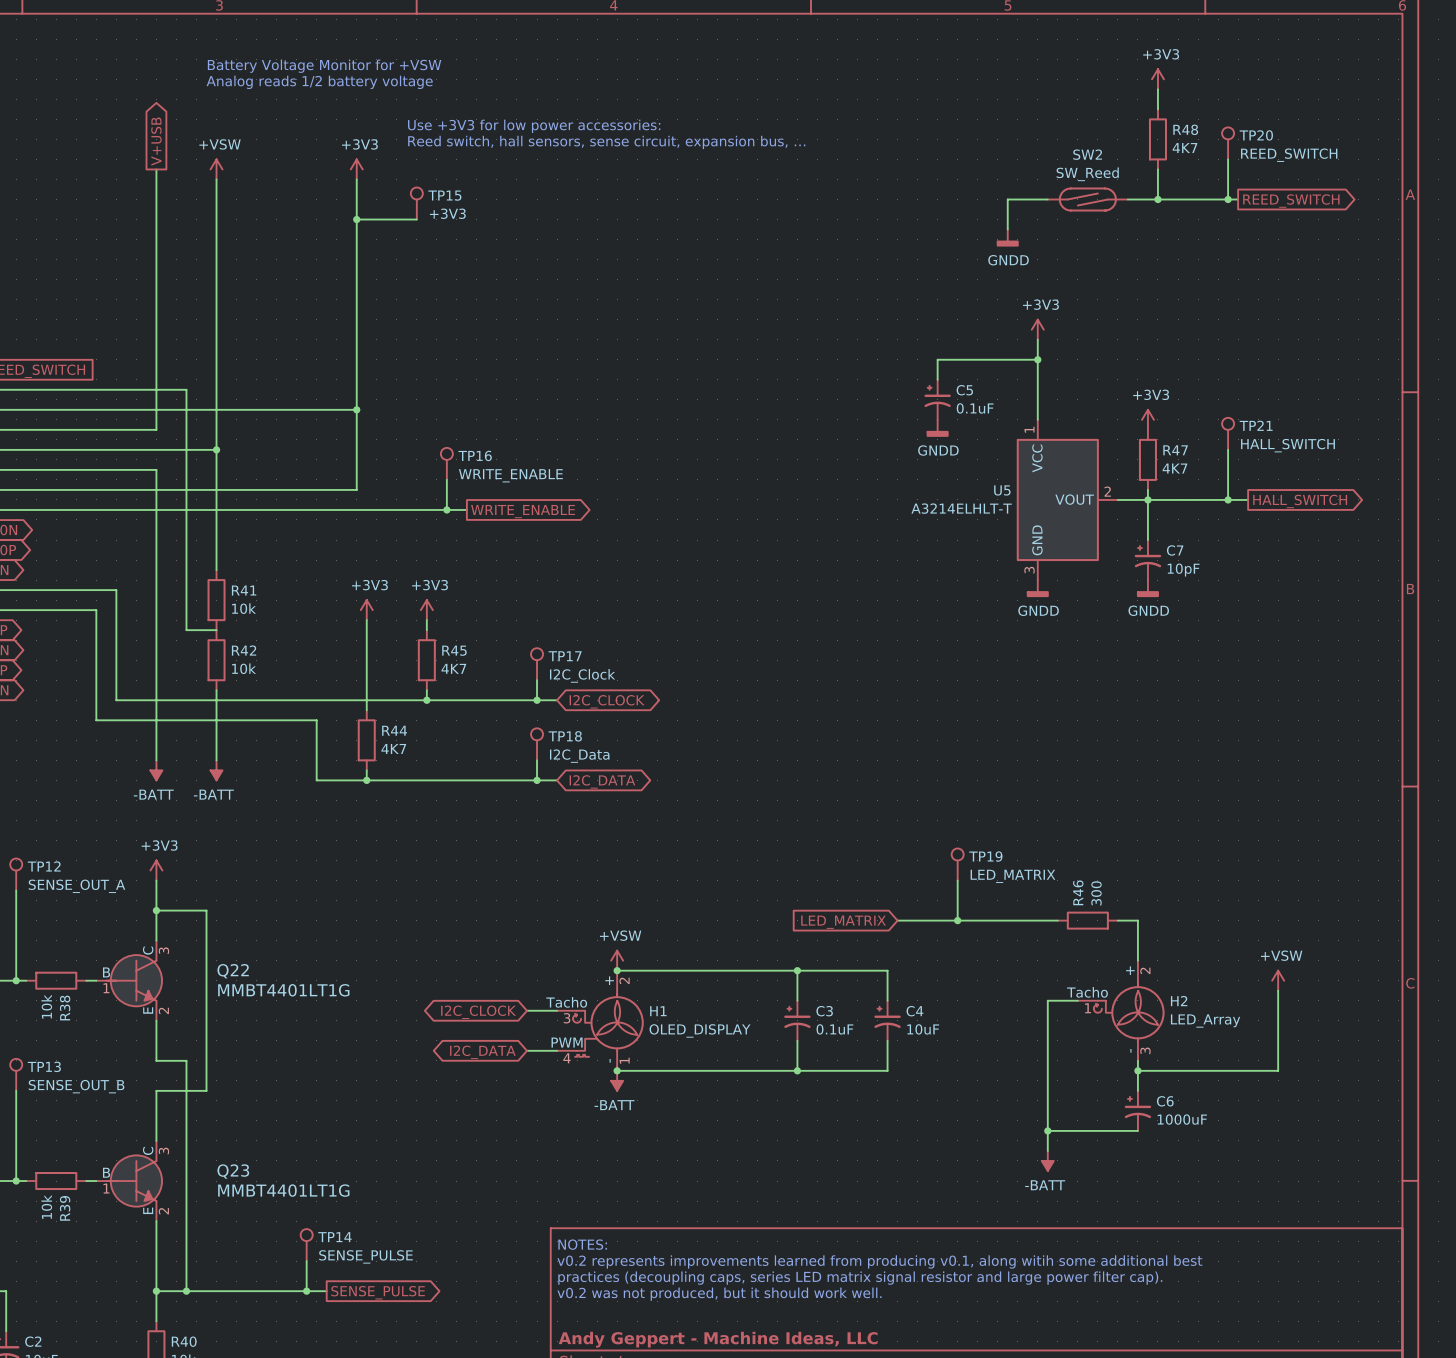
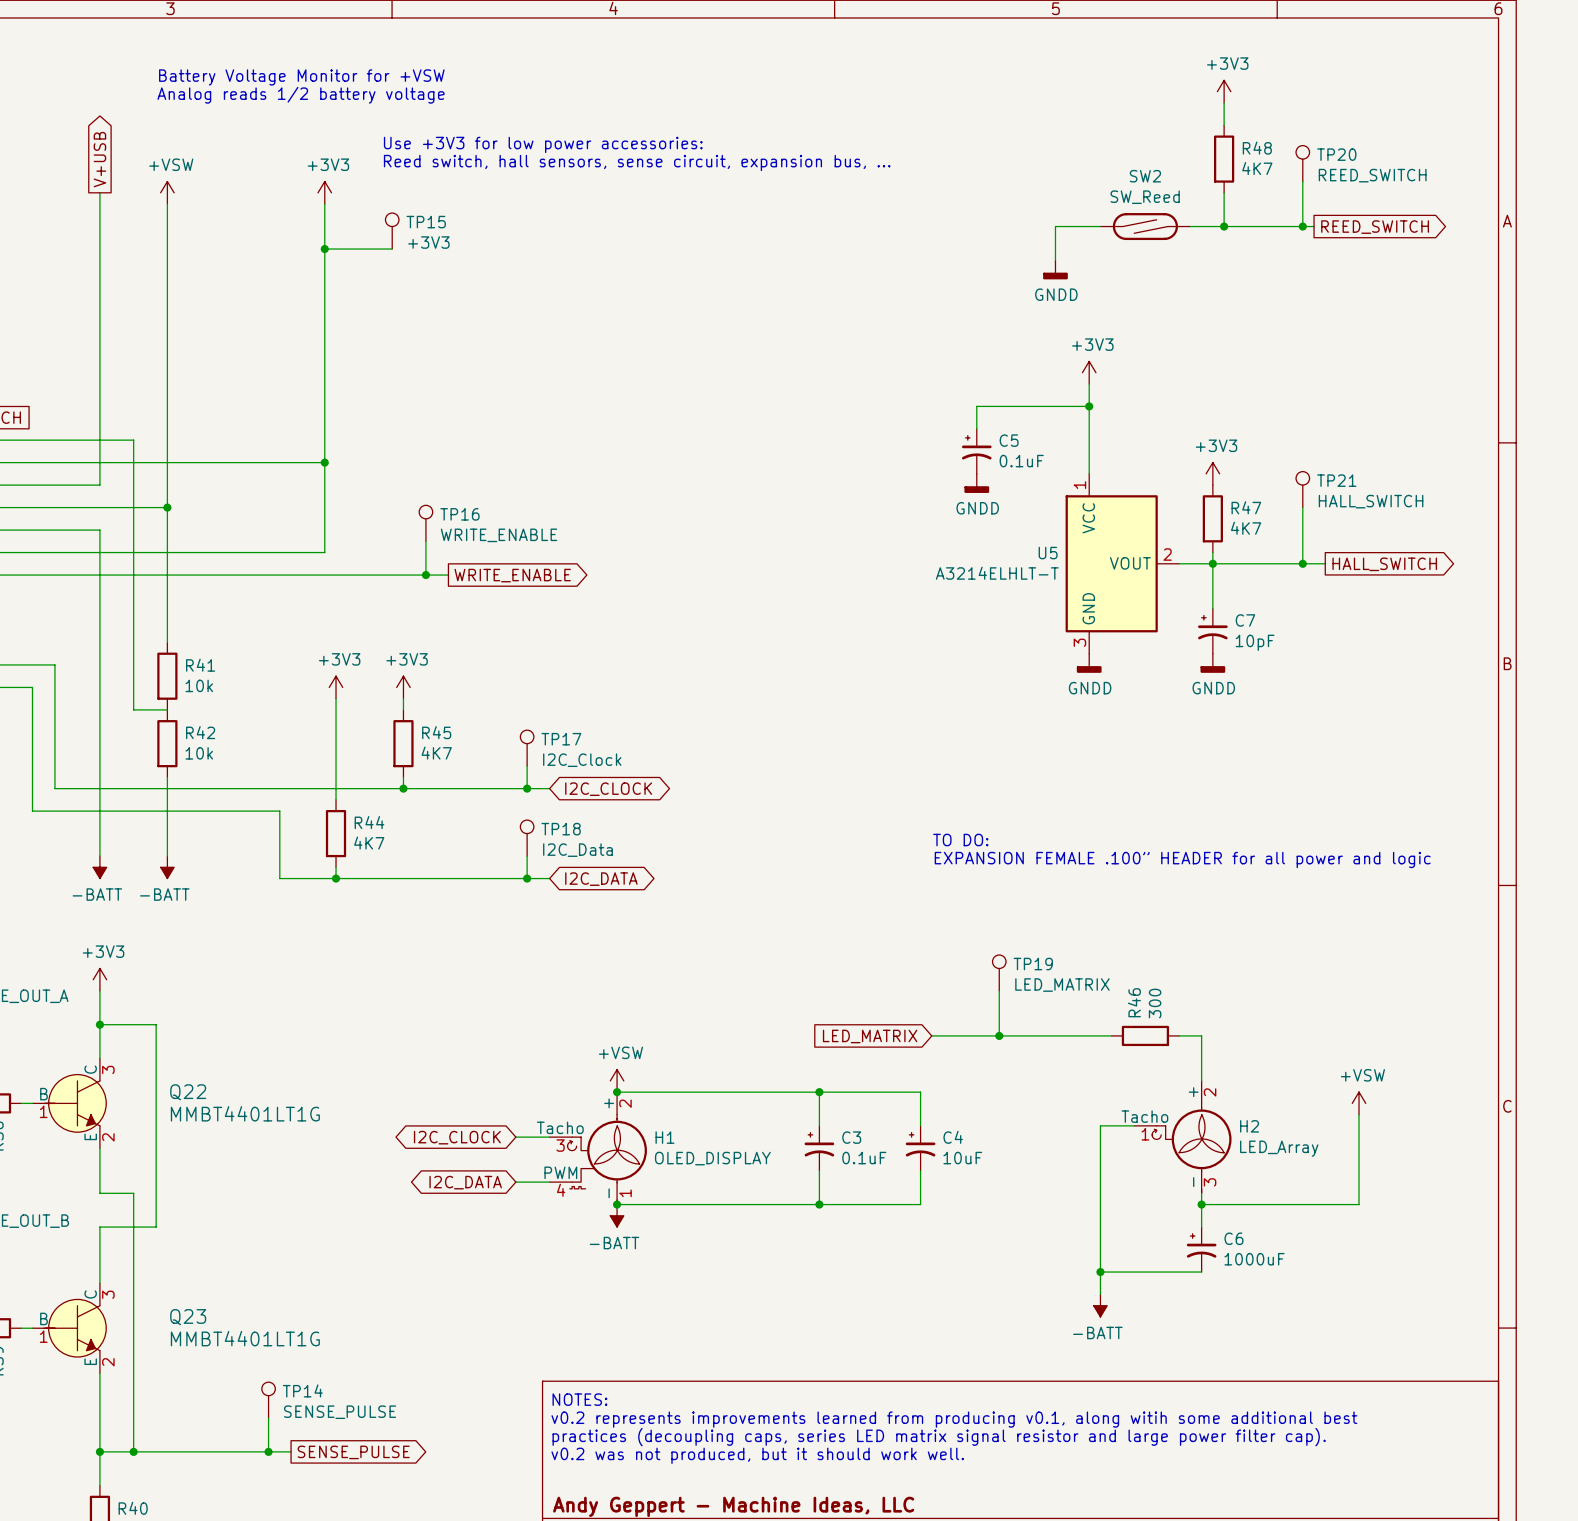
text: none -> TO DO: (960, 840)
text: none -> EXPANSION FEMALE .100” HEADER for all power and logic (1182, 859)

